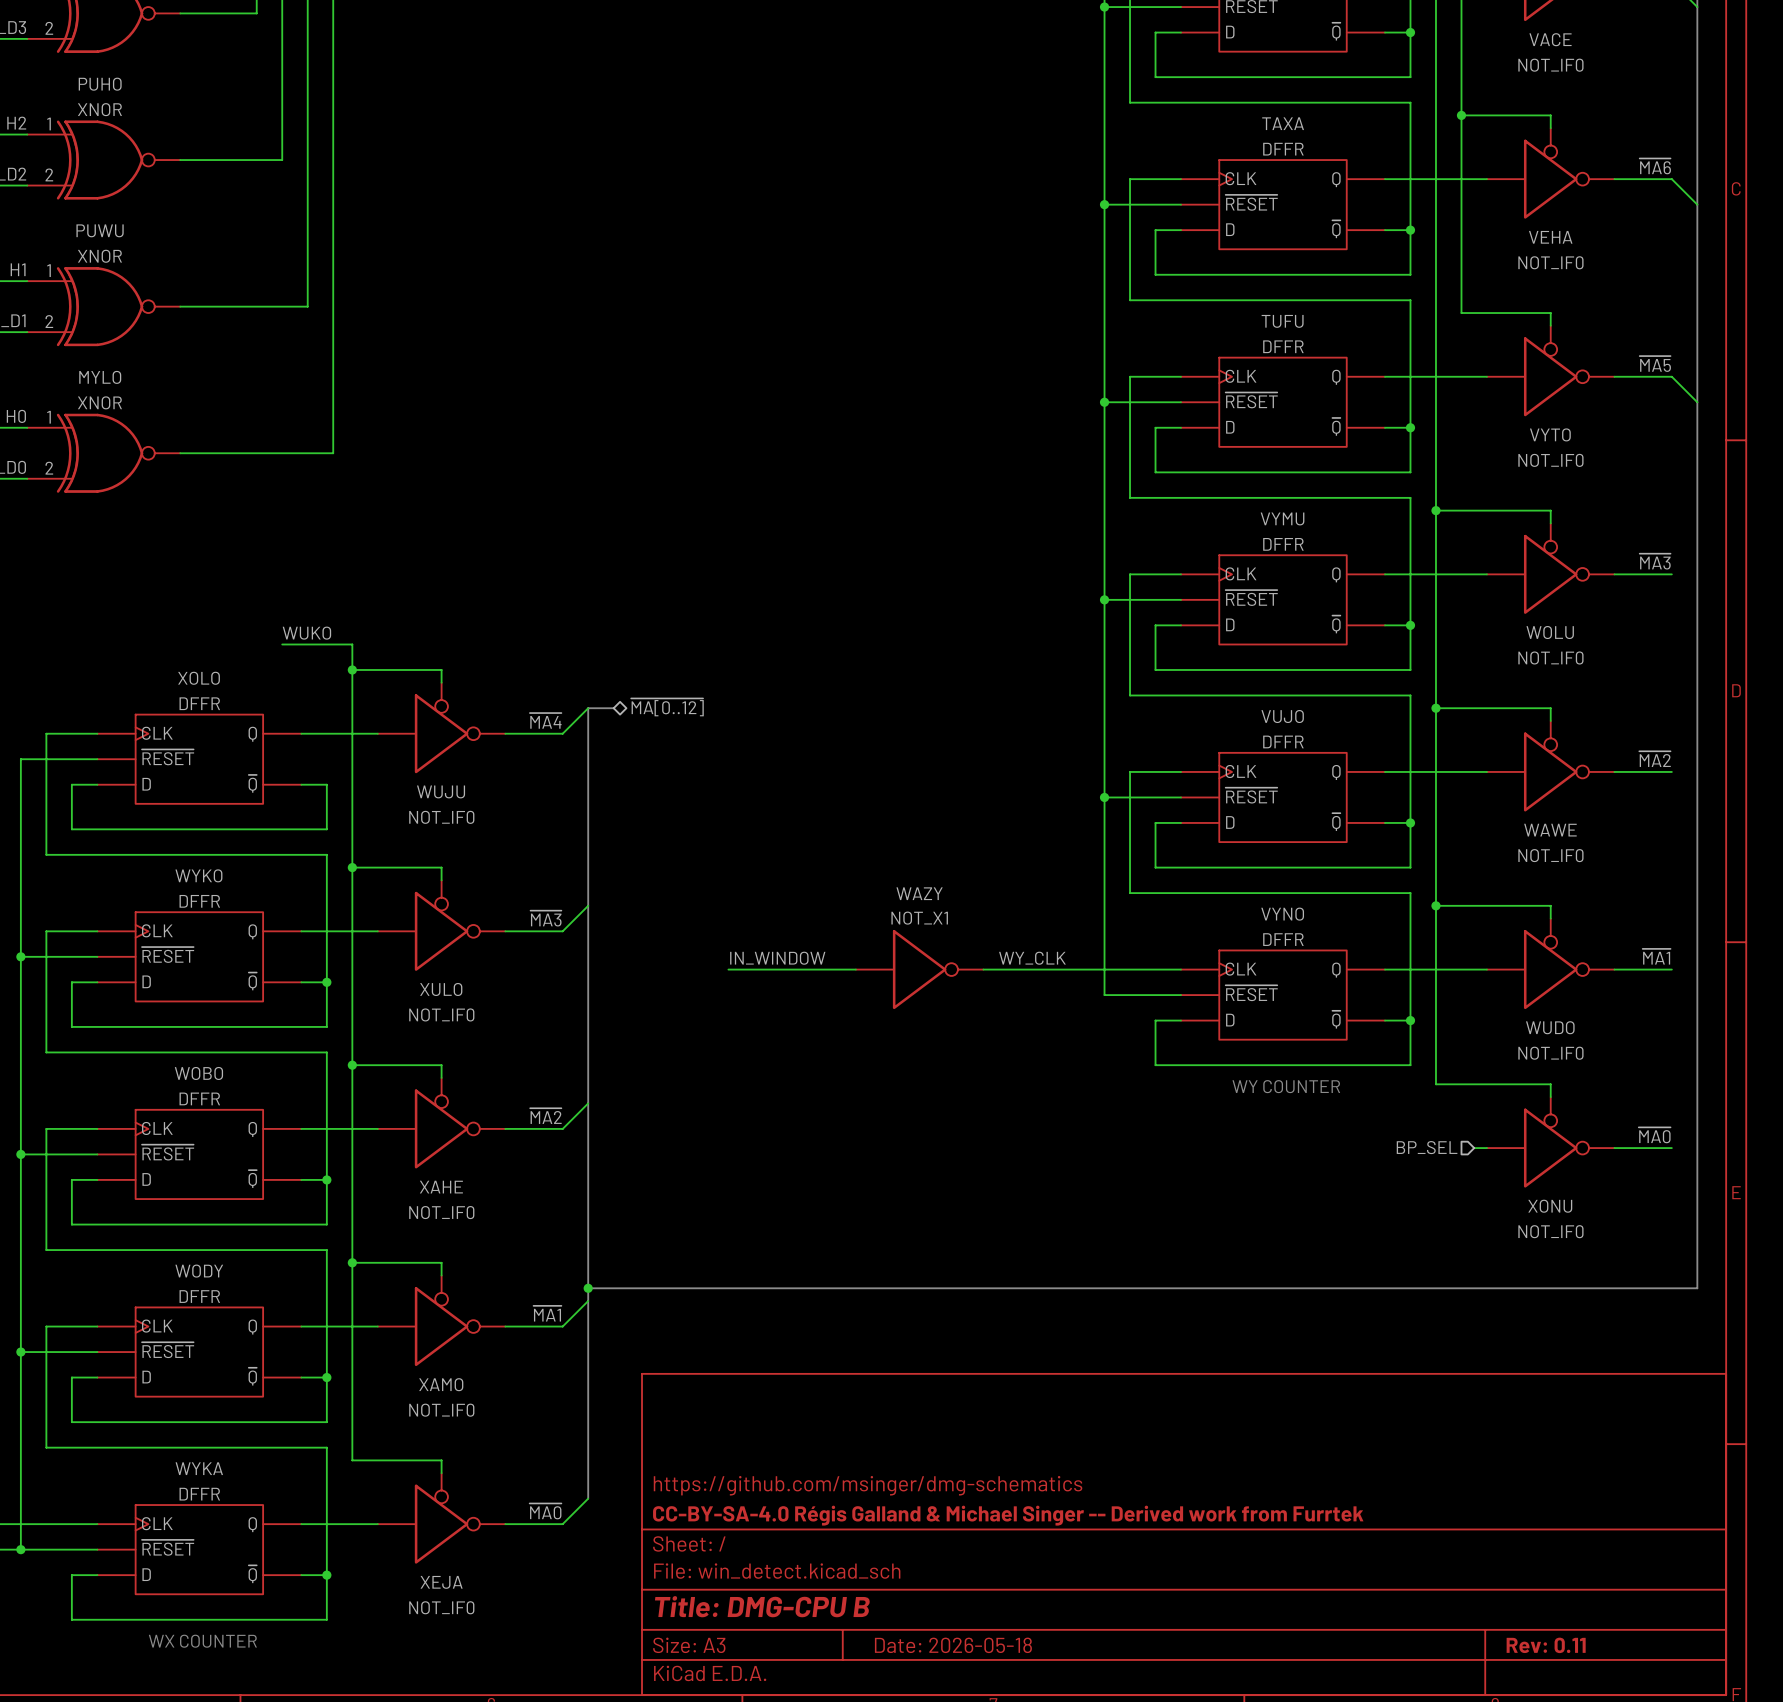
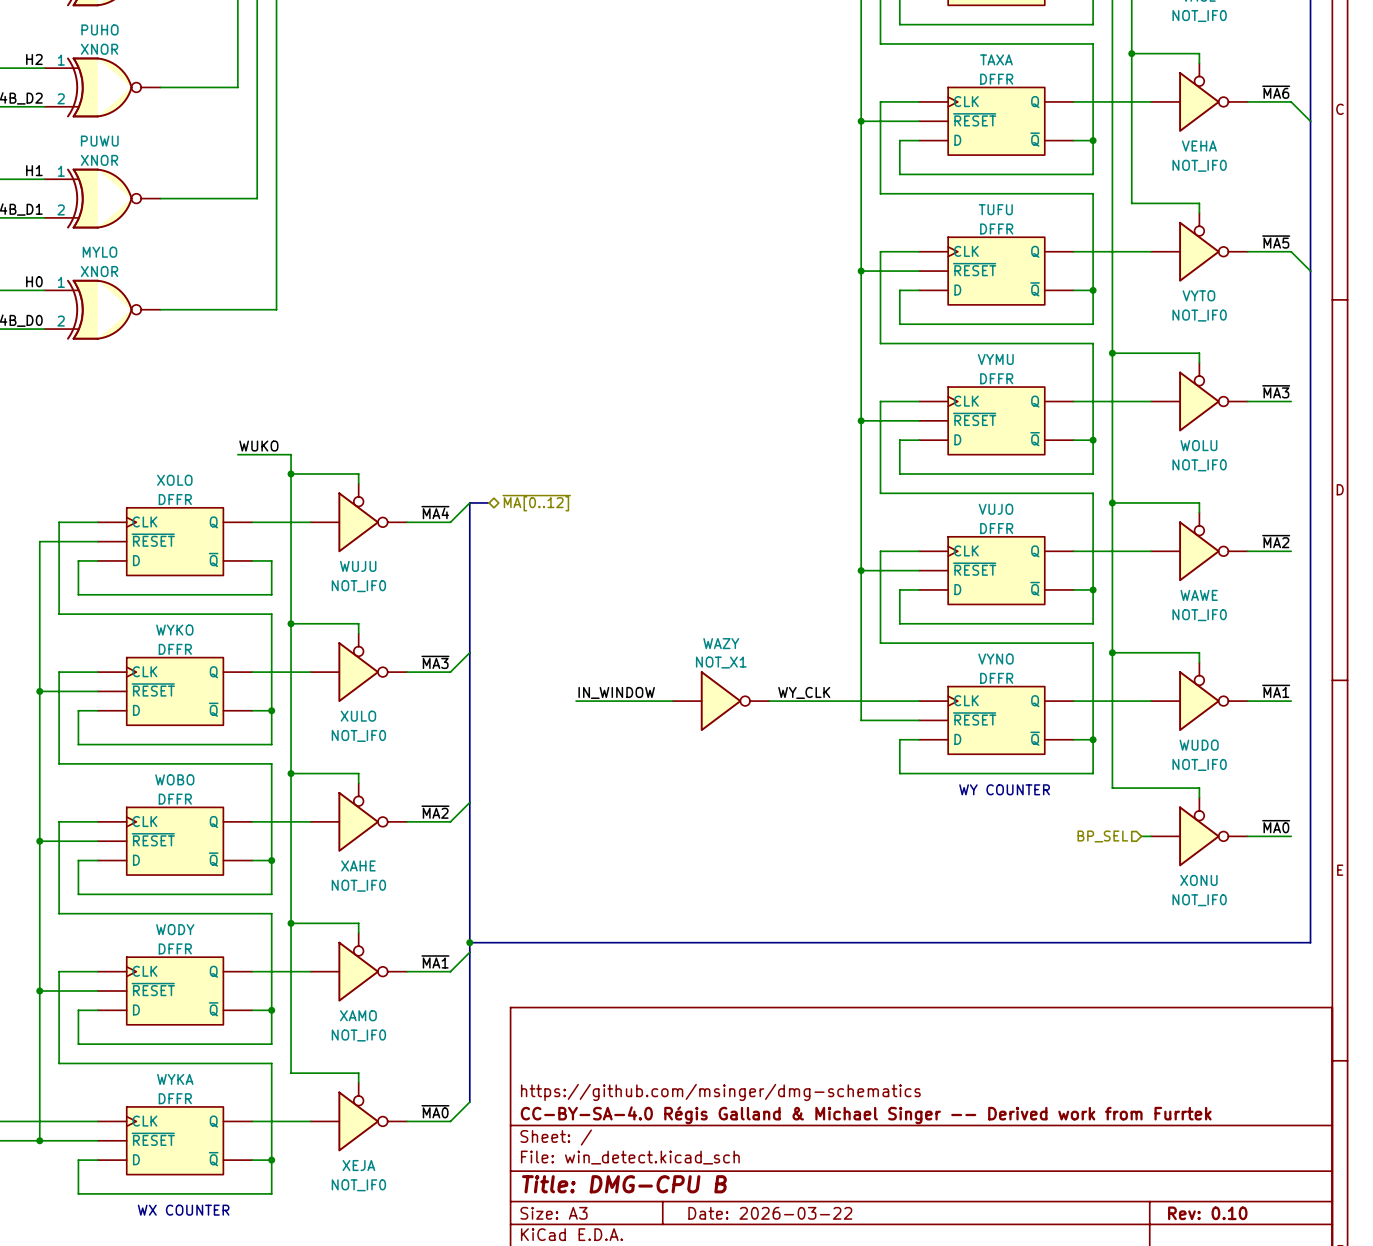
title block: Date: 2026-05-18 (953, 1645) -> Date: 2026-03-22 (770, 1213)
title block: Rev: 0.11 (1546, 1645) -> Rev: 0.10 (1207, 1213)

